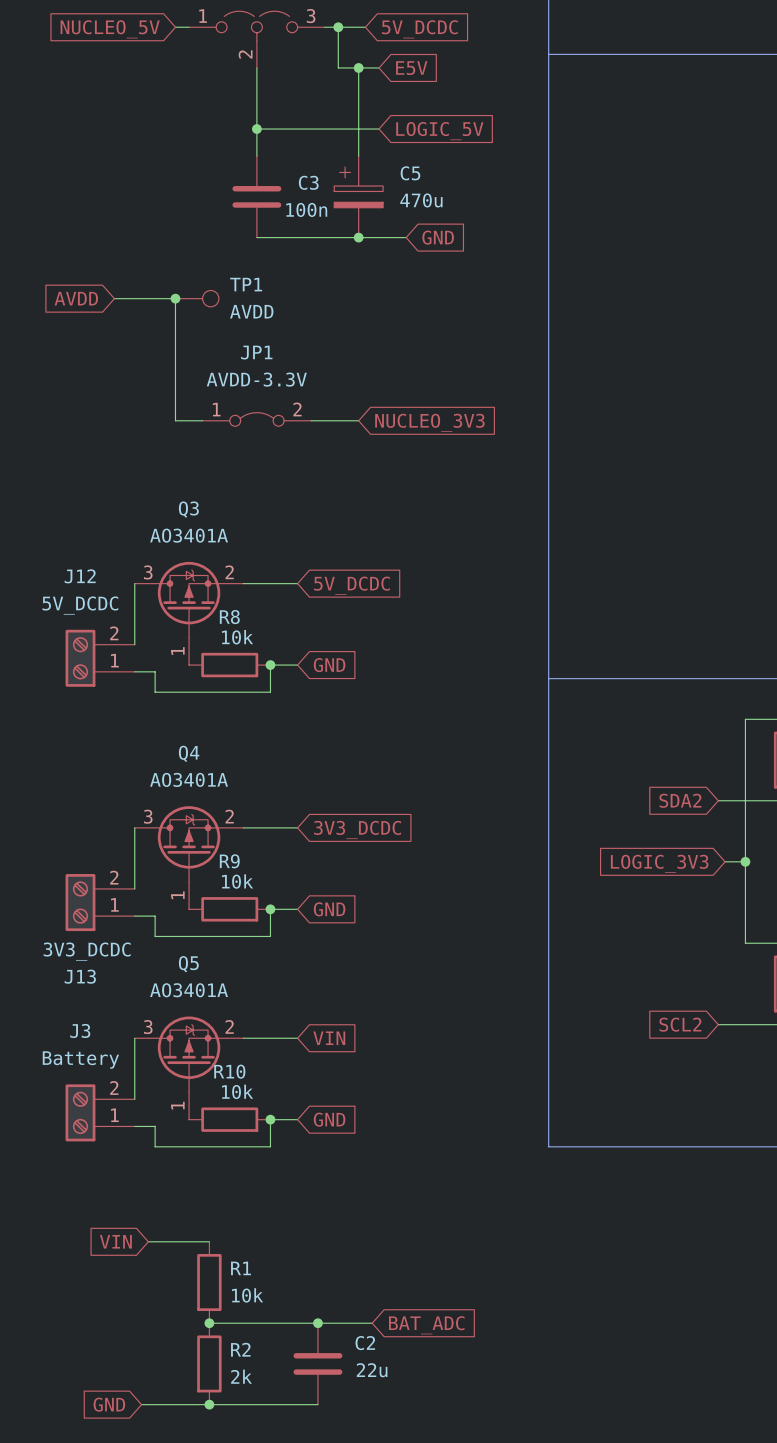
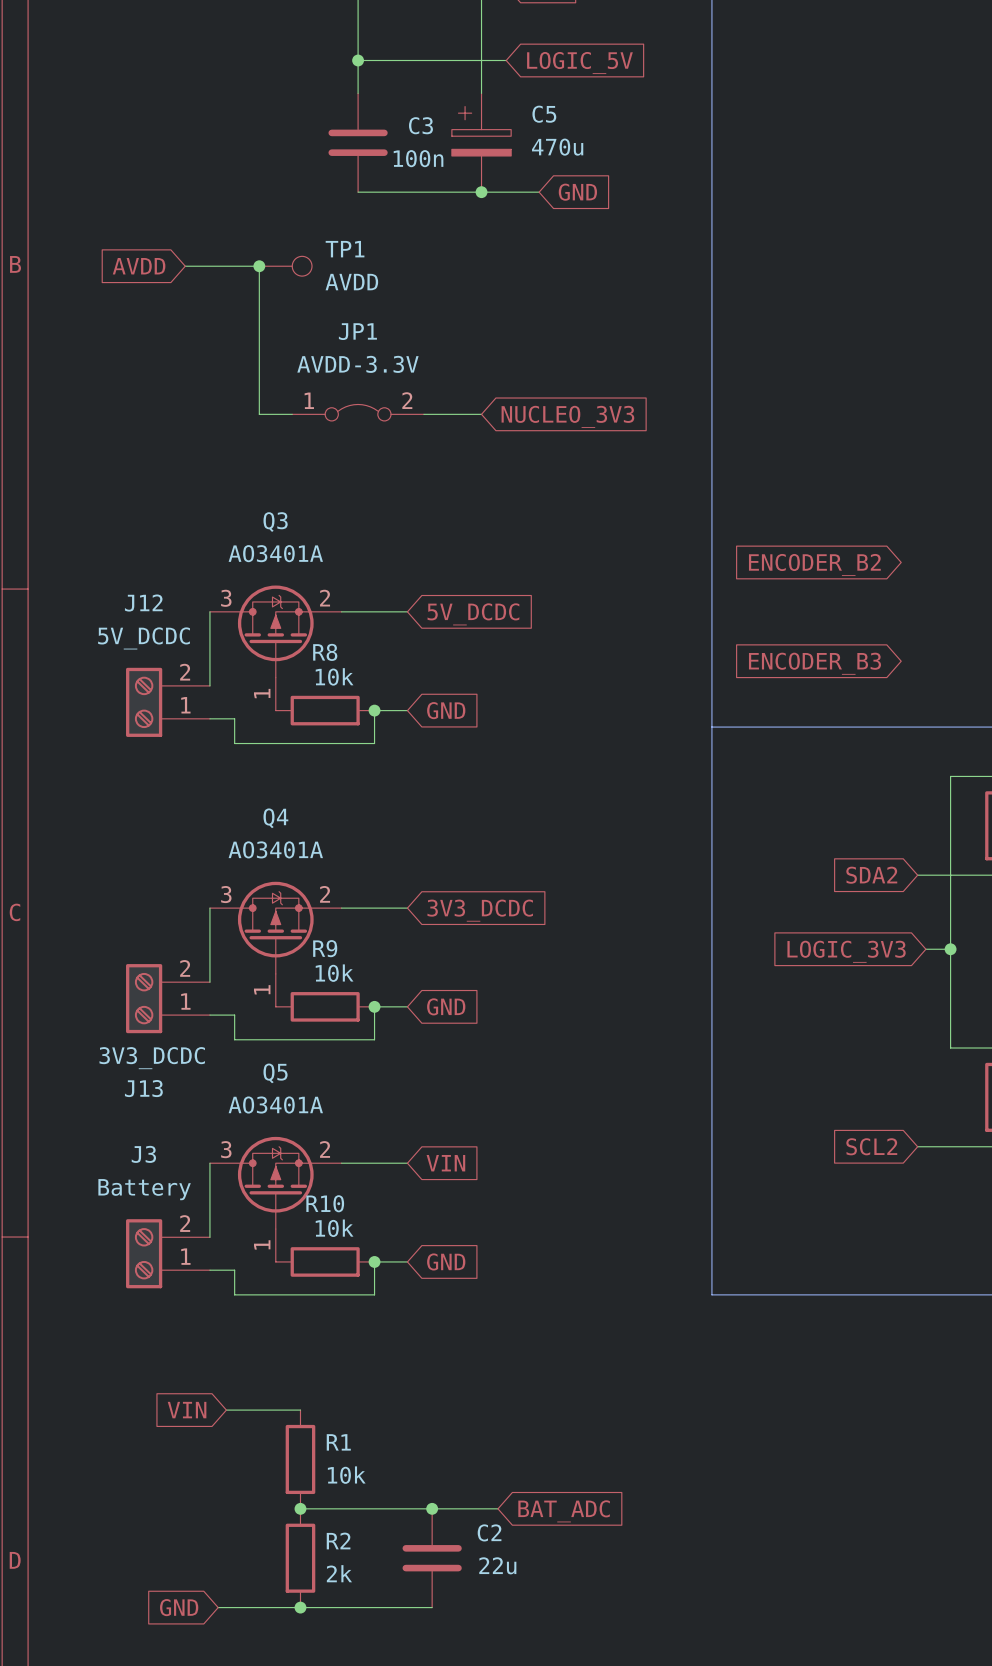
global label: none -> ENCODER_B2 (814, 564)
global label: none -> ENCODER_B3 (814, 663)

